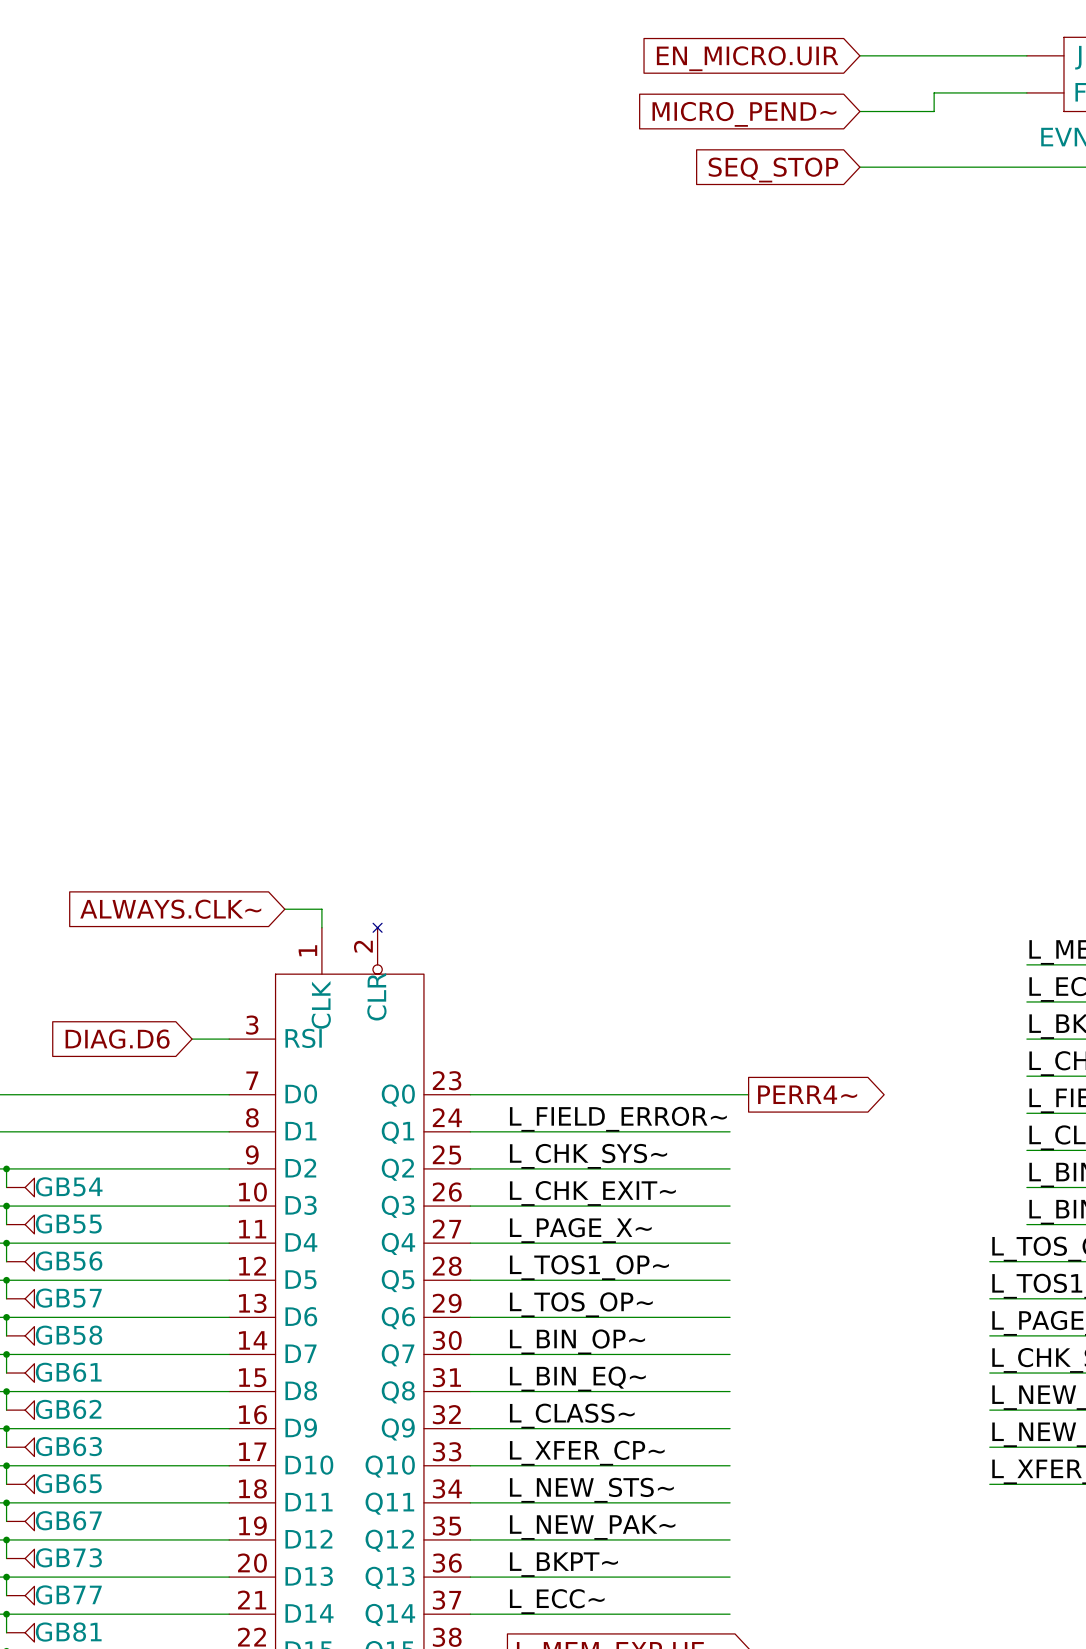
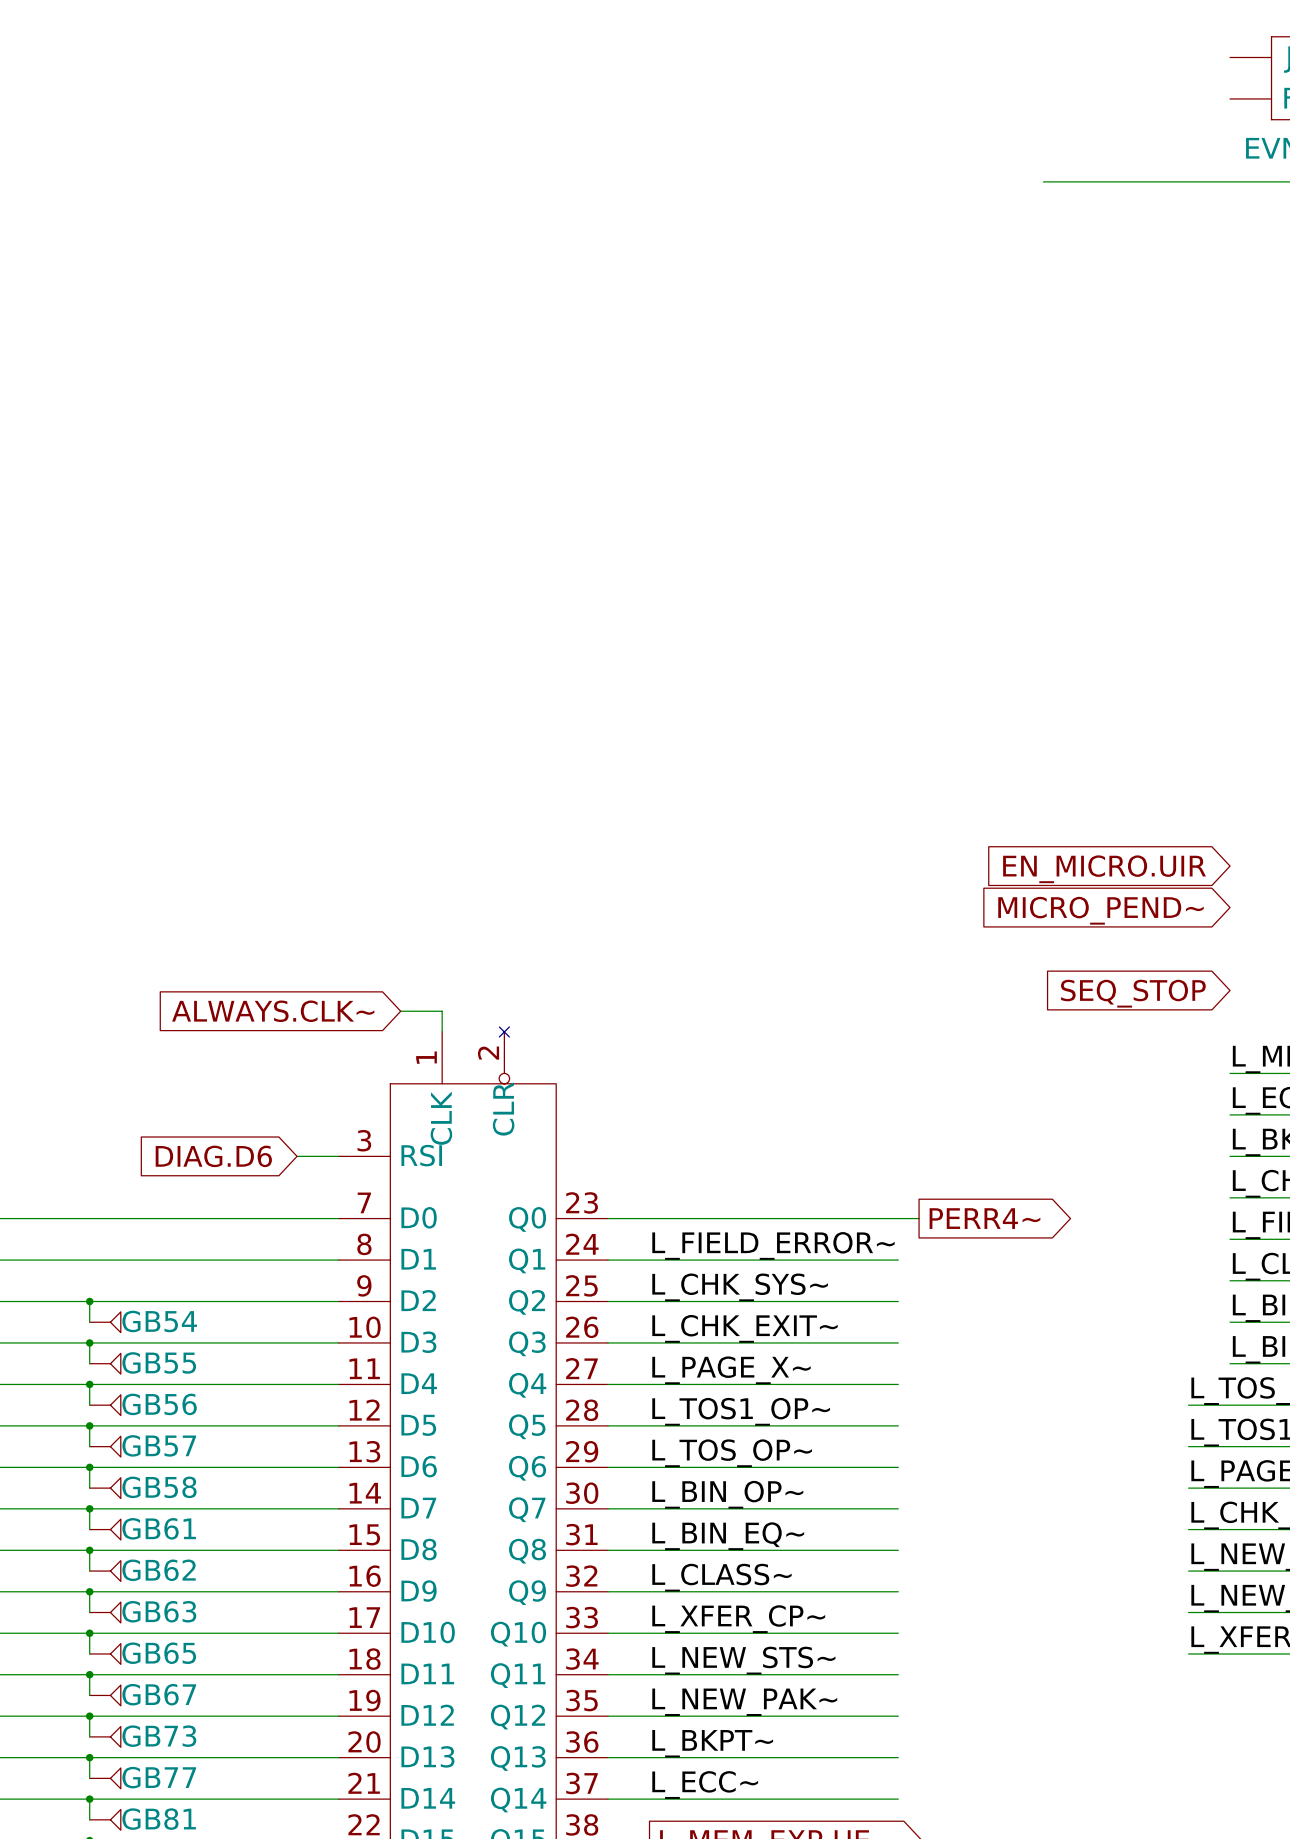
wire: (859, 55) (1026, 55) -> none
global label: EN_MICRO.UIR (747, 58) -> none
wire: (1026, 92) (934, 92) (934, 111) (859, 111) -> none
global label: MICRO_PEND~ (744, 114) -> none
global label: SEQ_STOP (773, 170) -> none
global label: none -> EN_MICRO.UIR (1104, 869)
global label: none -> MICRO_PEND~ (1100, 910)
global label: none -> SEQ_STOP (1133, 993)

